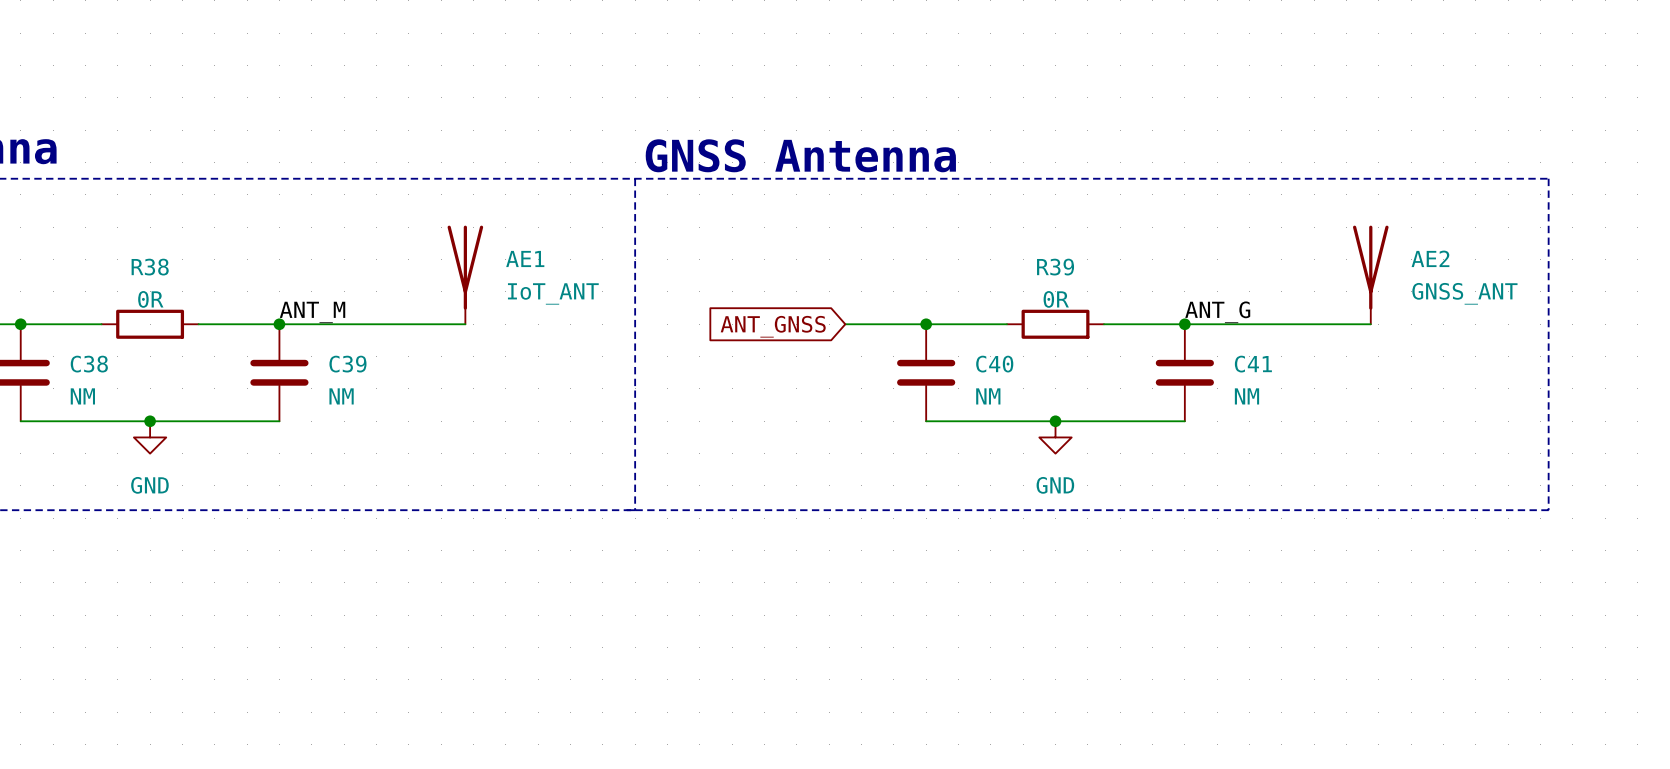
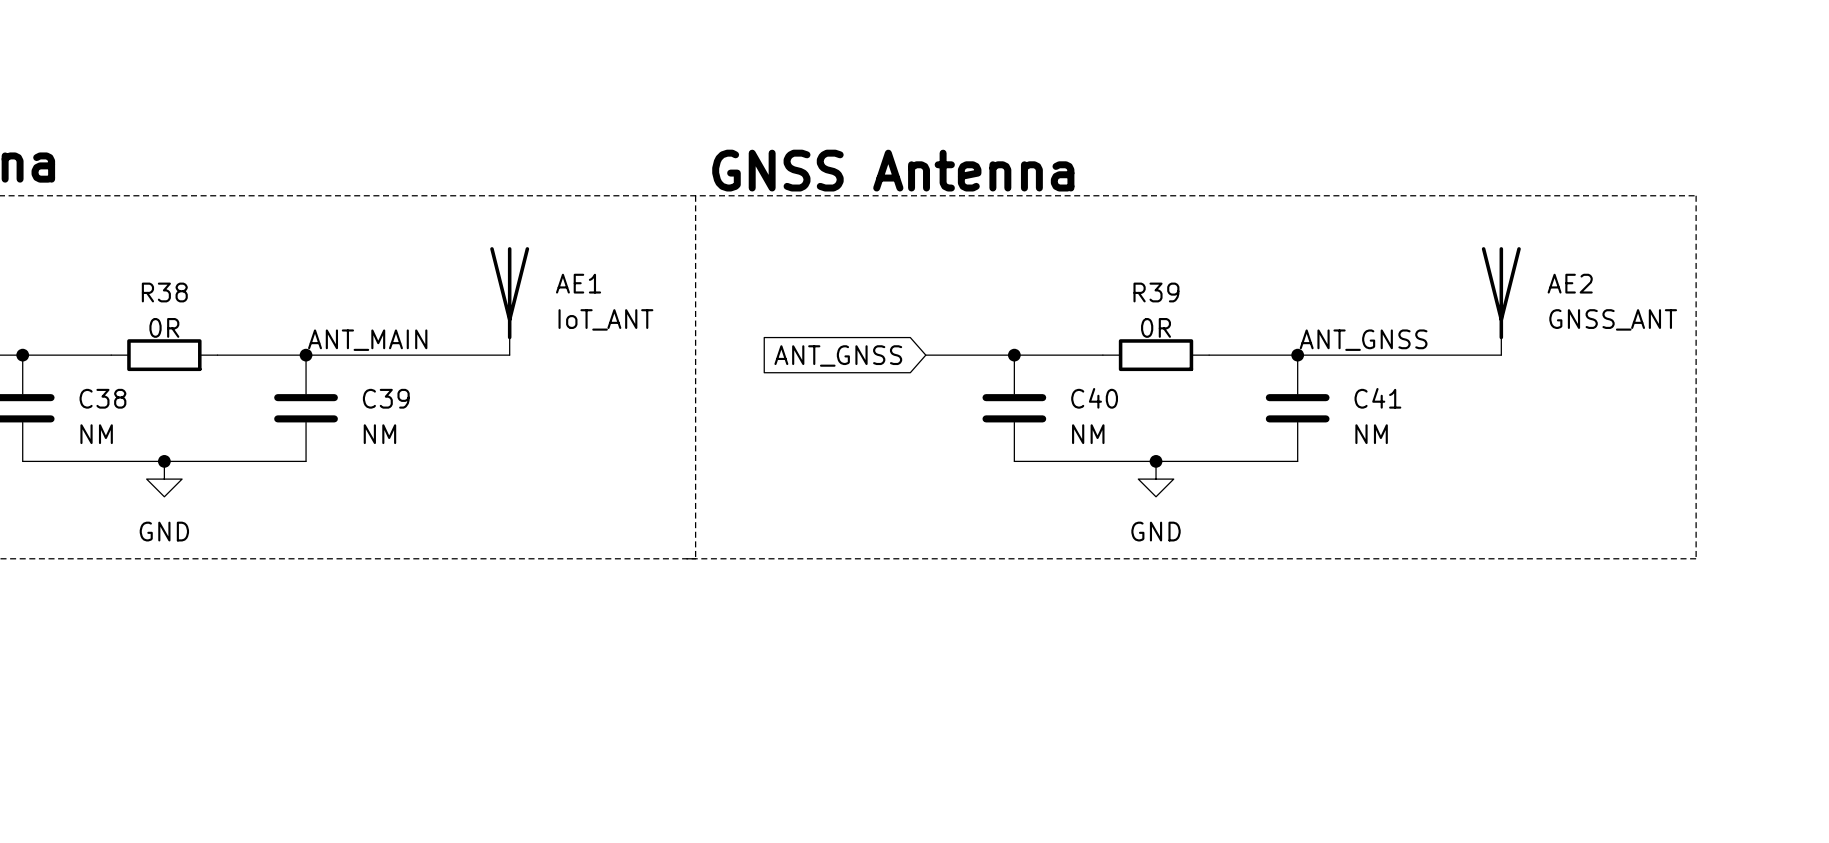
label: ANT_M (312, 312) -> ANT_MAIN (367, 340)
label: ANT_G (1217, 312) -> ANT_GNSS (1363, 340)

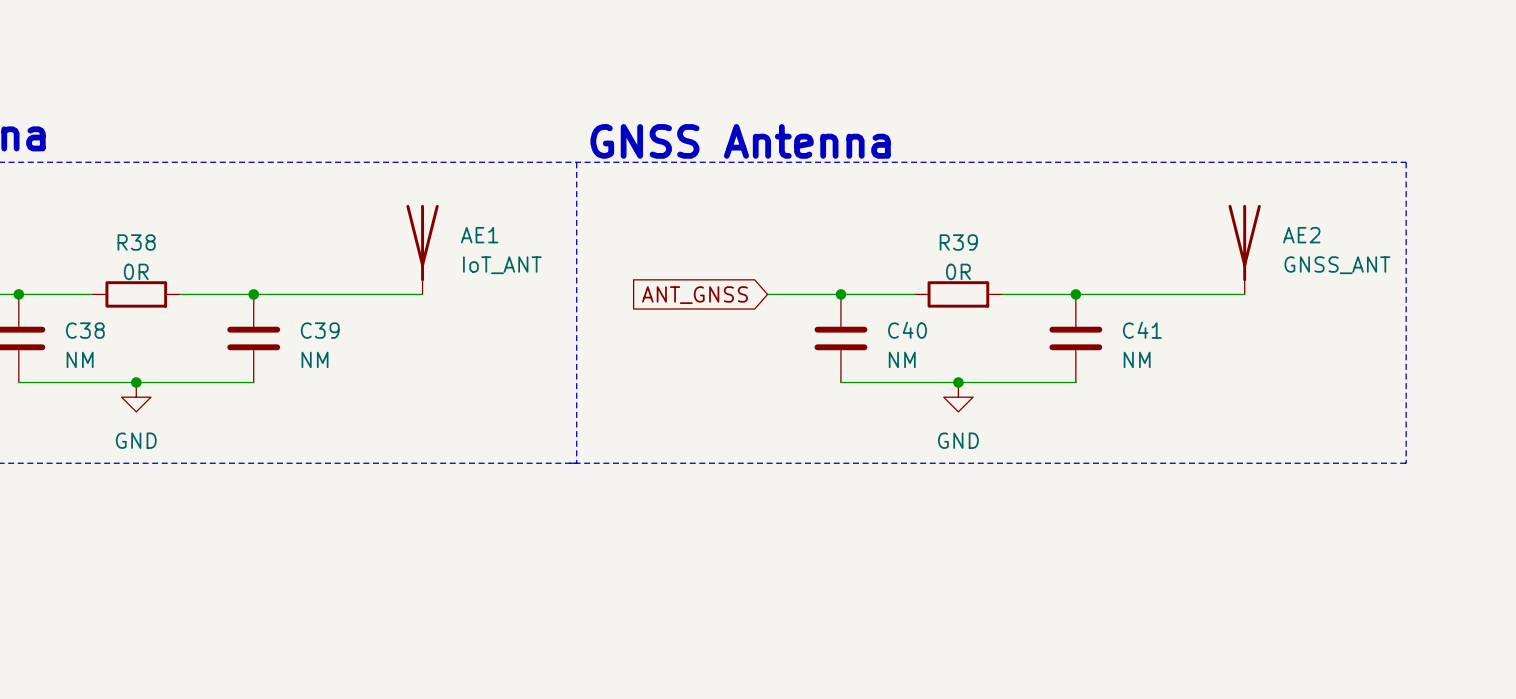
label: ANT_MAIN (367, 340) -> none
label: ANT_GNSS (1363, 340) -> none

